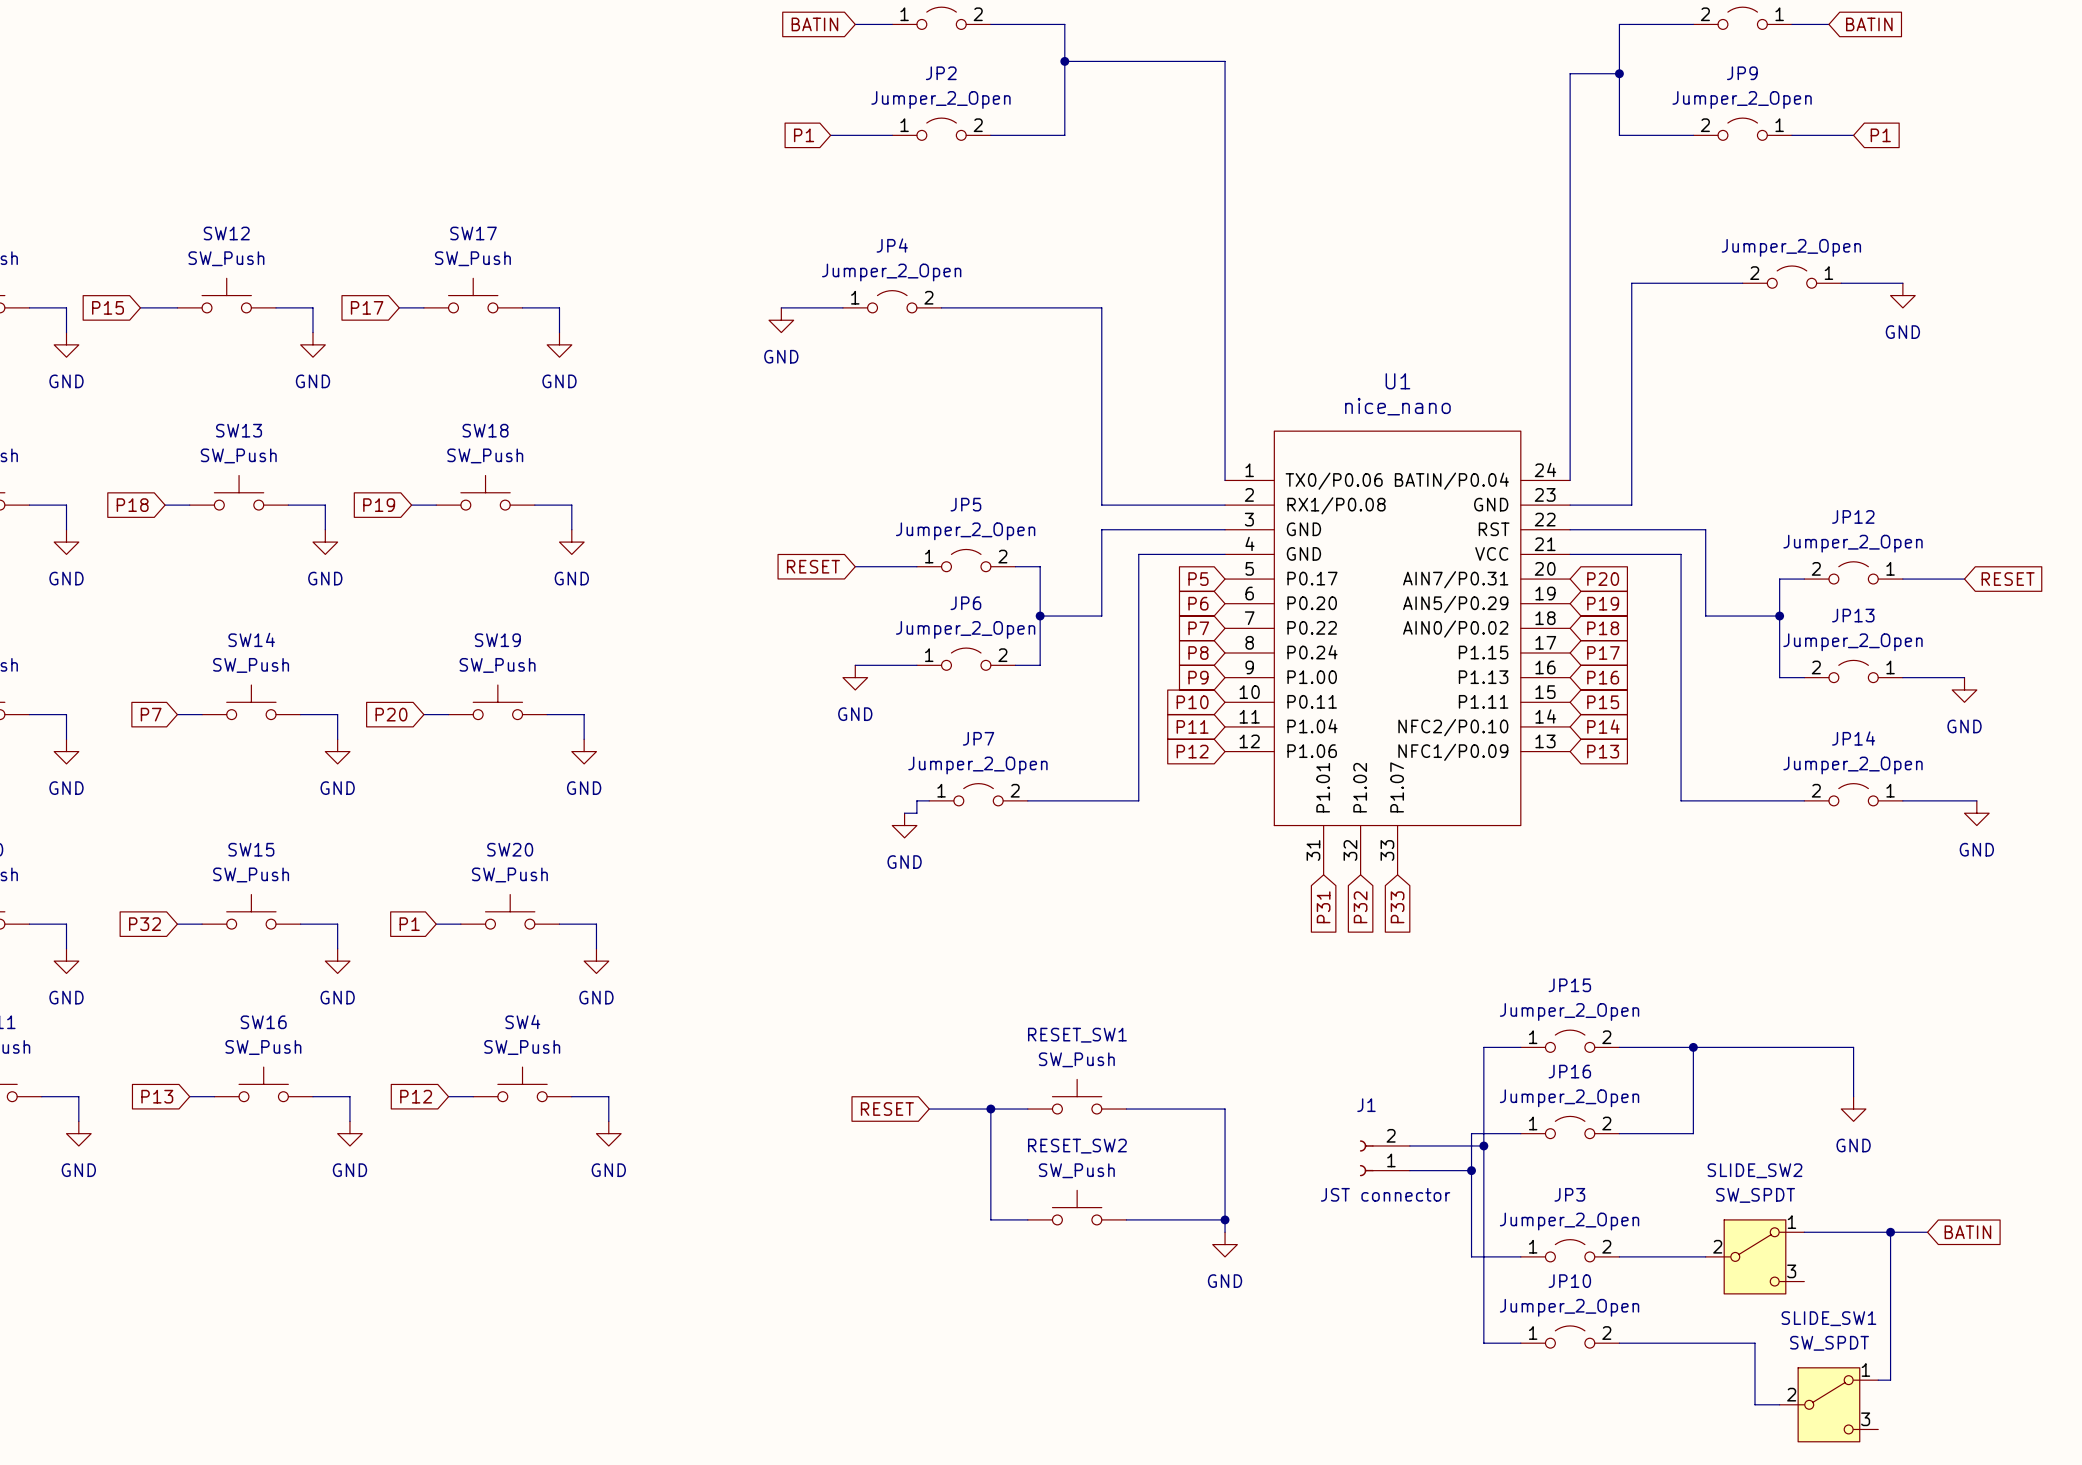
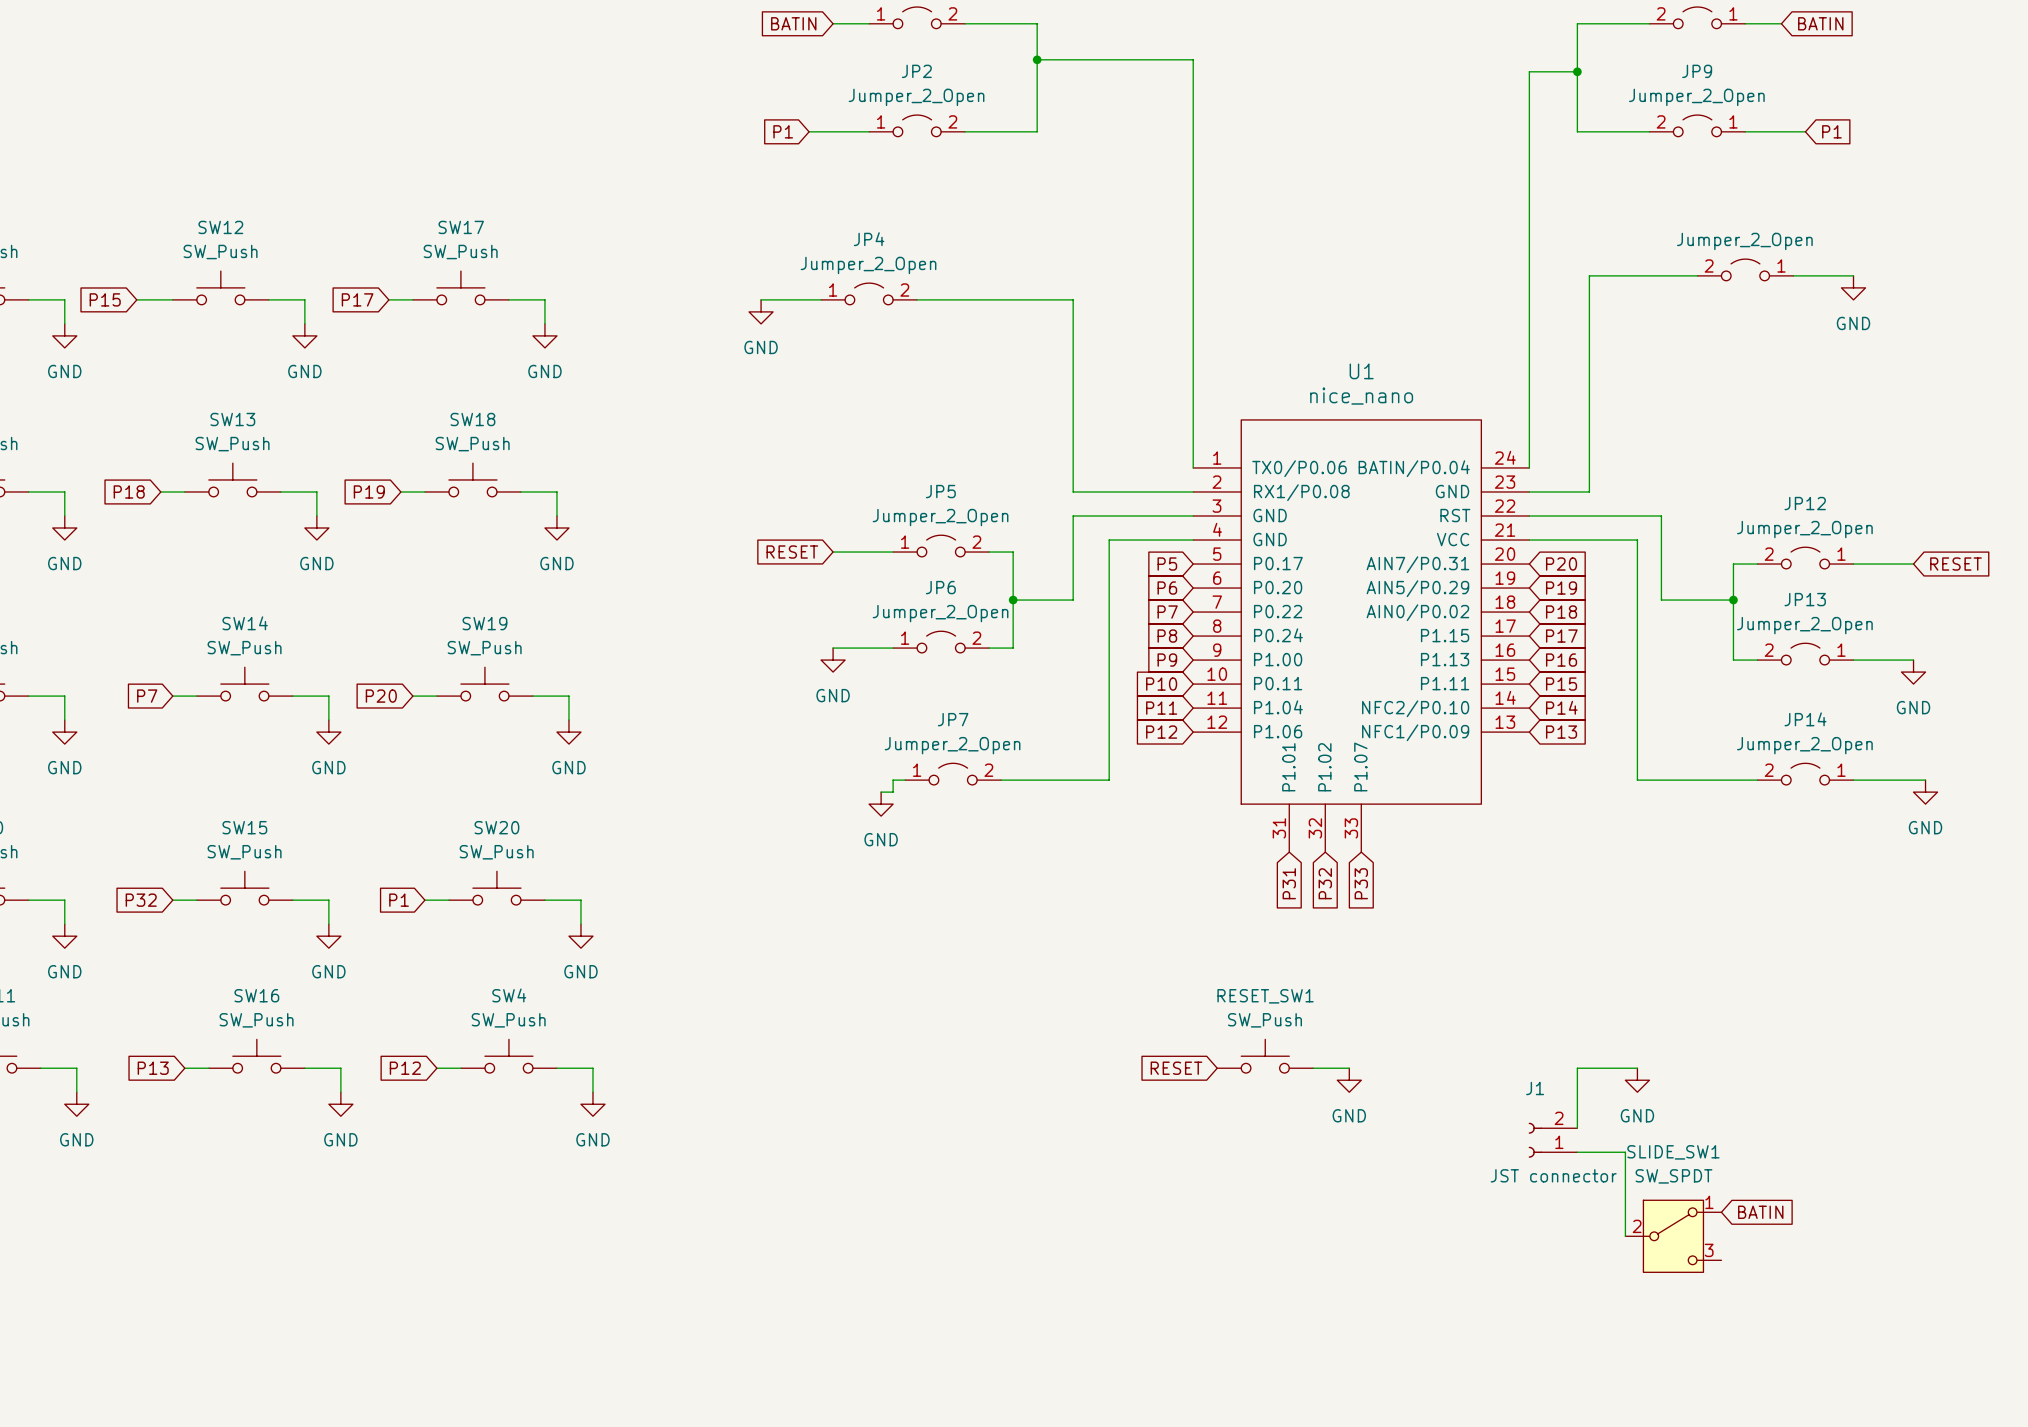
JP15: Jumper_2_Open (1570, 1041) -> none
wire: (1520, 1047) (1483, 1047) (1483, 1343) (1520, 1343) -> none
wire: (1619, 1047) (1853, 1047) (1853, 1096) -> none
wire: (1693, 1047) (1693, 1133) (1619, 1133) -> none
junction: (1693, 1047) -> none
RESET_SW1 position: (1077, 1096) -> (1265, 1056)
global label: none -> RESET (1176, 1068)
wire: none -> (1313, 1068) (1349, 1068)
wire: none -> (1637, 1068) (1577, 1068) (1577, 1128)
global label: RESET (887, 1109) -> none
wire: (929, 1109) (1027, 1109) -> none
wire: (990, 1109) (990, 1219) (1027, 1219) -> none
junction: (990, 1109) -> none
wire: (1126, 1109) (1225, 1109) (1225, 1232) -> none
power symbol position: GND (1853, 1109) -> GND (1637, 1080)
JP16: Jumper_2_Open (1570, 1127) -> none
wire: (1520, 1133) (1471, 1133) (1471, 1256) (1520, 1256) -> none
wire: (1409, 1145) (1483, 1145) -> none
junction: (1483, 1145) -> none
J1 position: (1384, 1158) -> (1553, 1140)
wire: (1409, 1170) (1471, 1170) -> none
junction: (1471, 1170) -> none
wire: none -> (1577, 1152) (1625, 1152) (1625, 1236)
RESET_SW2: SW_Push (1077, 1207) -> none
wire: (1126, 1219) (1225, 1219) -> none
junction: (1225, 1219) -> none
wire: (1804, 1232) (1927, 1232) -> none
wire: (1890, 1232) (1890, 1380) (1878, 1380) -> none
junction: (1890, 1232) -> none
global label position: BATIN (1967, 1232) -> BATIN (1760, 1212)
power symbol position: GND (1225, 1244) -> GND (1349, 1080)
JP3: Jumper_2_Open (1570, 1250) -> none
wire: (1619, 1256) (1705, 1256) -> none
SLIDE_SW2: SW_SPDT (1754, 1256) -> none
JP10: Jumper_2_Open (1570, 1337) -> none
wire: (1619, 1343) (1754, 1343) (1754, 1404) (1779, 1404) -> none
SLIDE_SW1 position: (1828, 1404) -> (1673, 1236)

